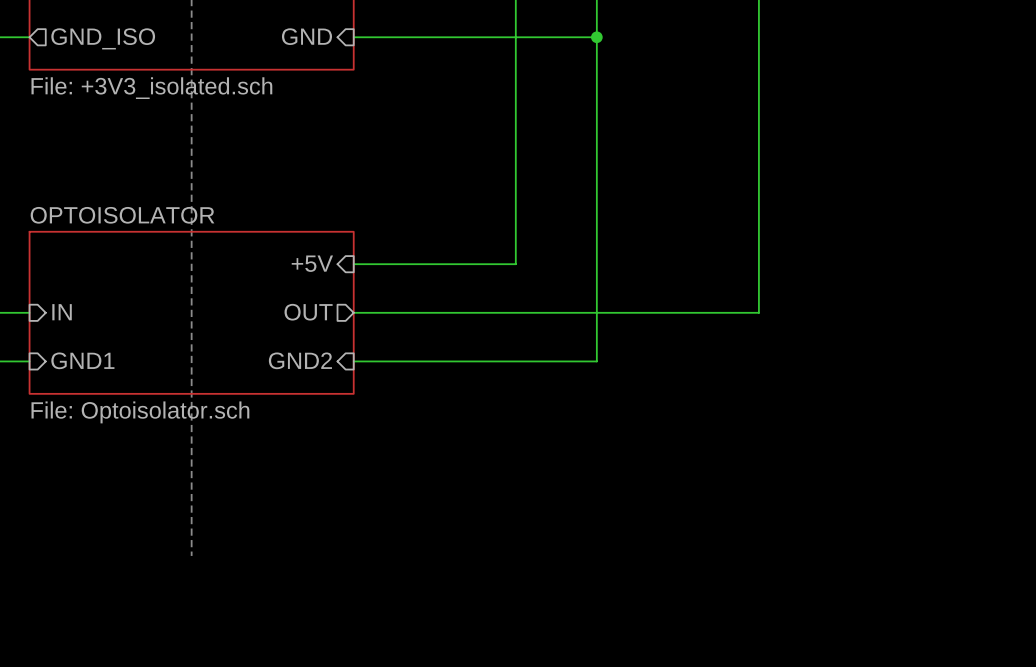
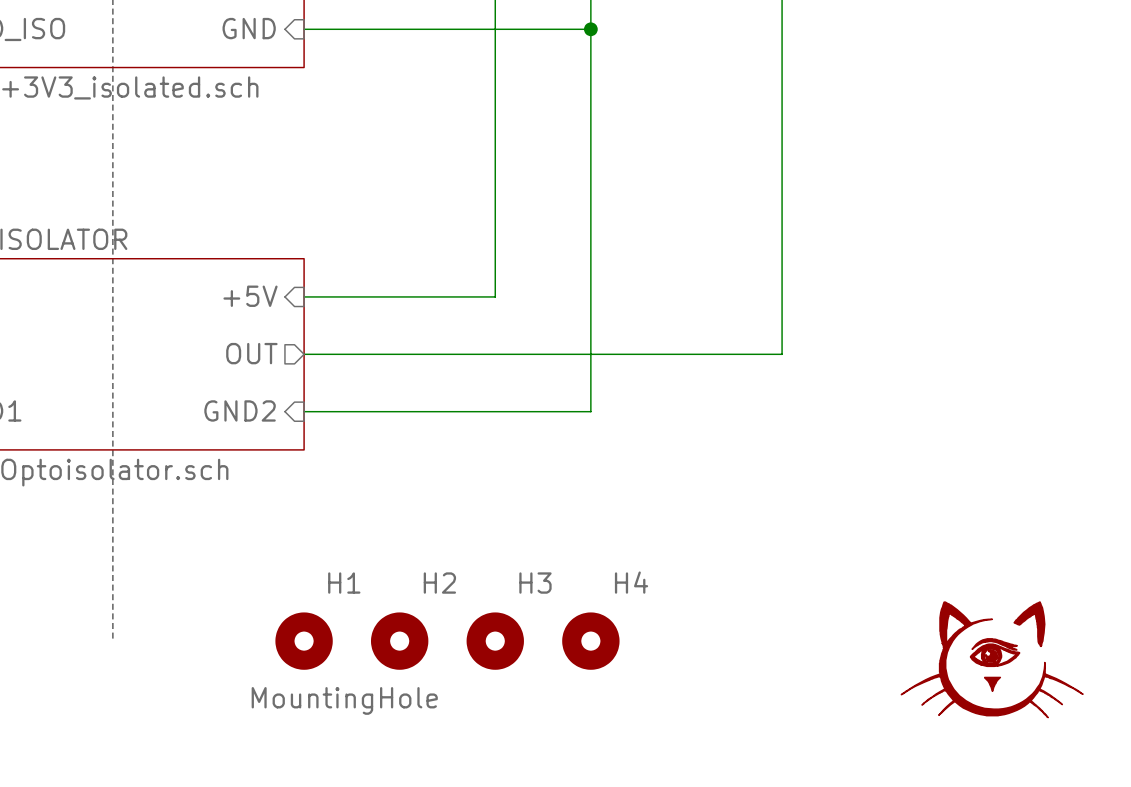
H1: none -> MountingHole (304, 641)
H2: none -> (399, 641)
H3: none -> (495, 641)
H4: none -> (590, 641)
part: none -> (992, 659)

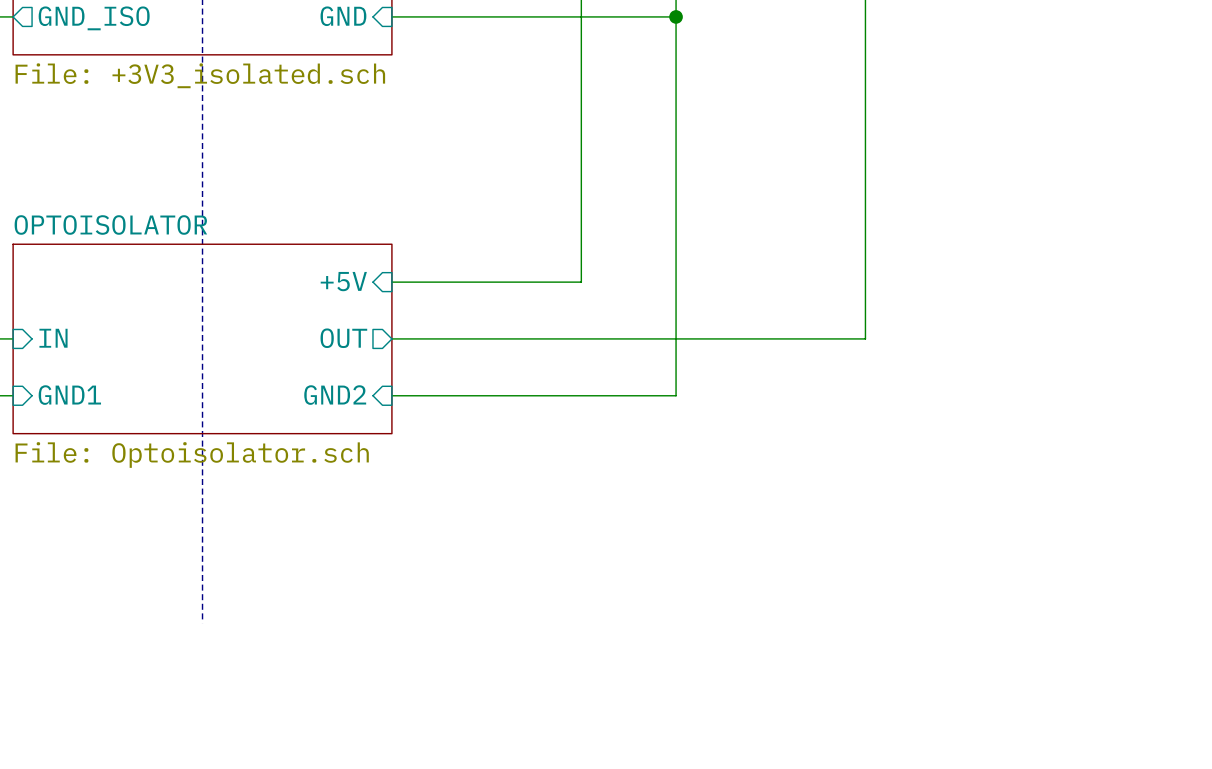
H1: MountingHole (304, 641) -> none
H2: (399, 641) -> none
H3: (495, 641) -> none
H4: (590, 641) -> none
part: (992, 659) -> none

